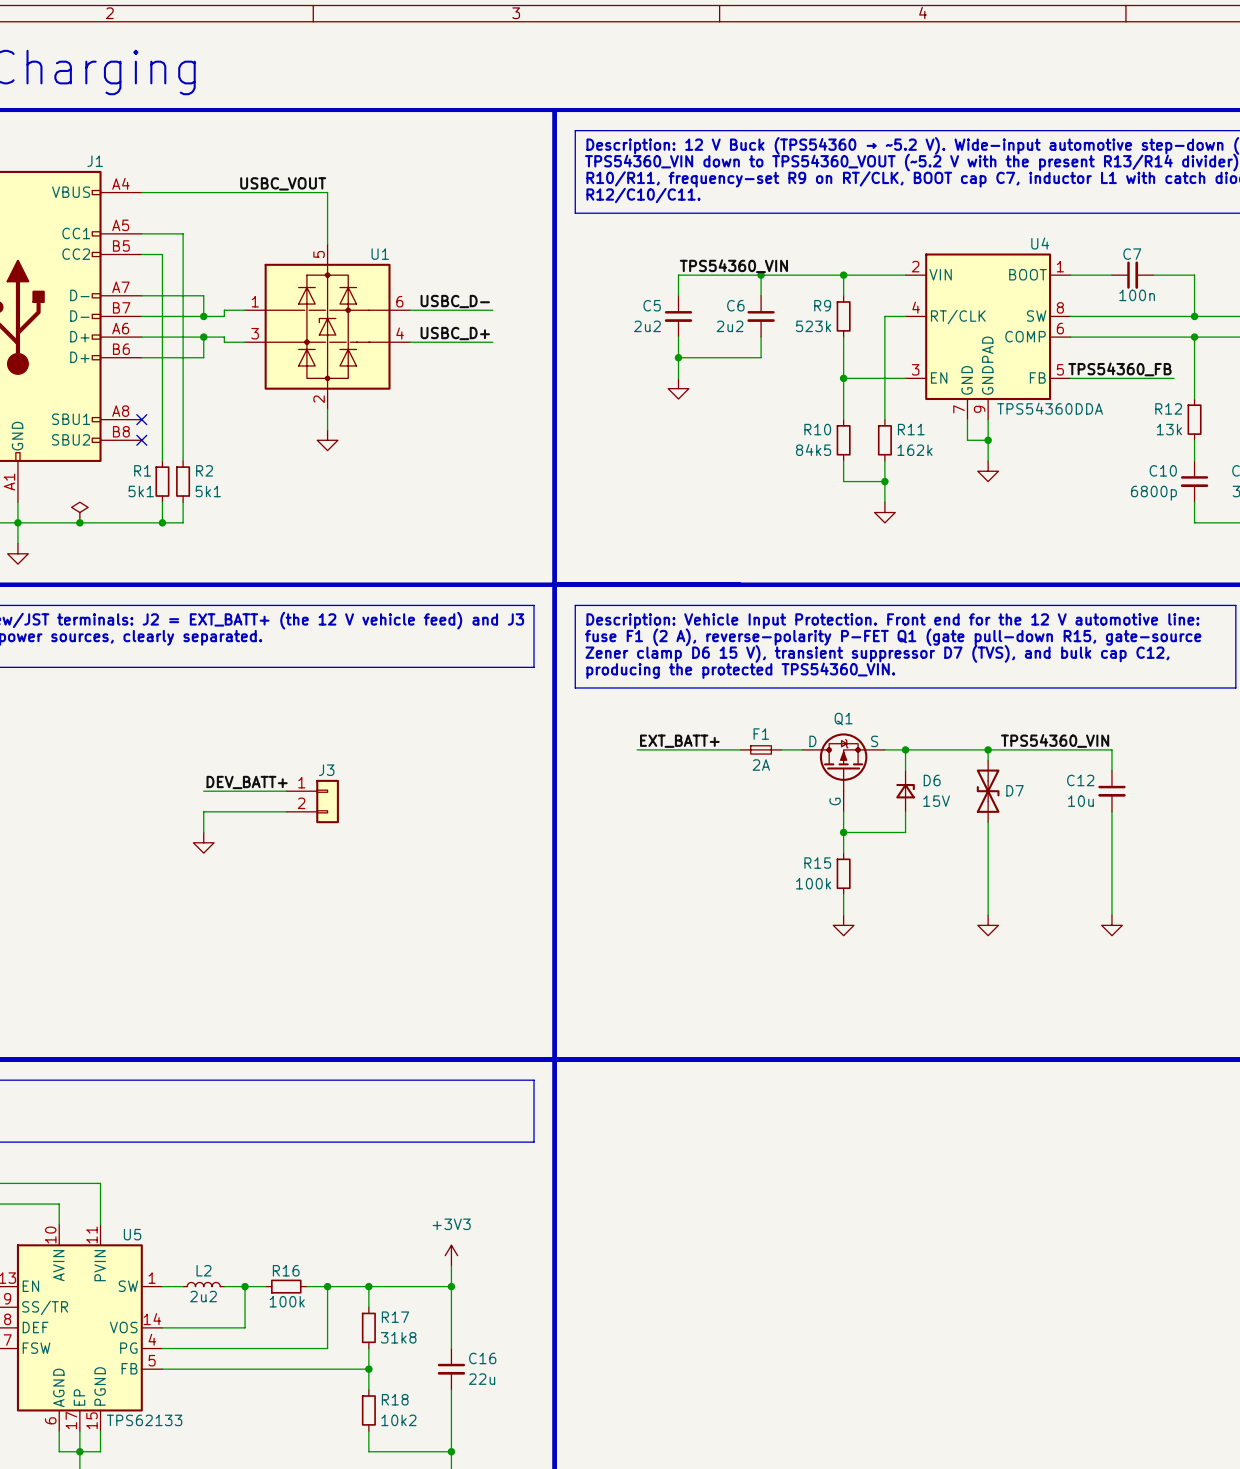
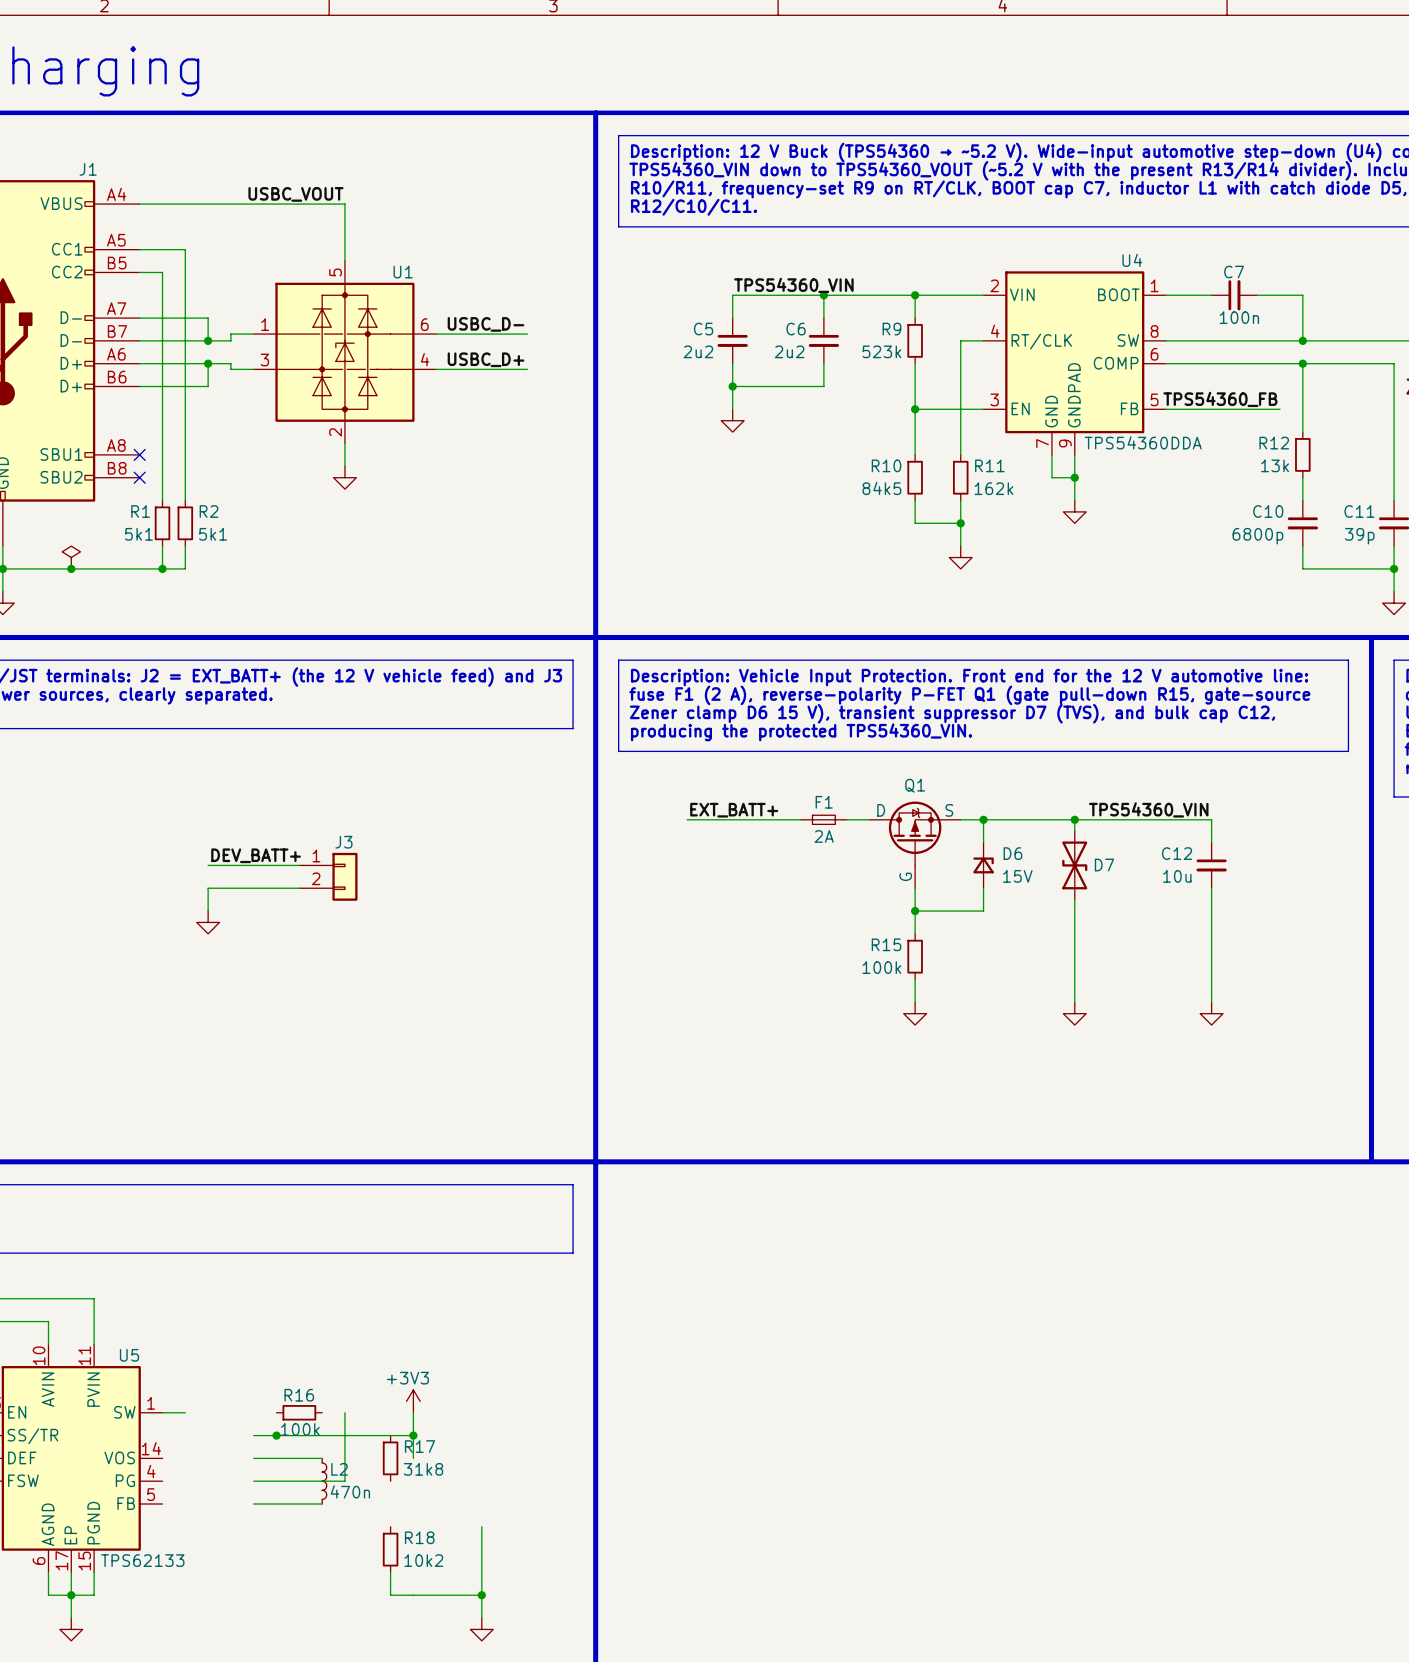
power symbol text position: +3V3 (451, 1224) -> +3V3 (407, 1378)
power symbol position: +3V3 (451, 1255) -> +3V3 (413, 1401)
wire: (451, 1265) (451, 1348) -> none
L2 rotation: 0° (203, 1284) -> 90° clockwise (324, 1481)
L2 position: (203, 1284) -> (324, 1481)
wire: (224, 1286) (265, 1286) -> none
wire: (245, 1286) (245, 1327) (162, 1327) -> none
junction position: (245, 1286) -> (276, 1435)
wire: (306, 1286) (451, 1286) -> (253, 1435) (413, 1435)
junction: (327, 1286) -> none
wire: (368, 1286) (368, 1307) -> none
junction position: (368, 1286) -> (413, 1435)
junction: (451, 1286) -> none
L2 value: 2u2 (203, 1296) -> 470n (350, 1491)
wire: (162, 1348) (245, 1348) -> none
wire: (368, 1348) (368, 1389) -> (413, 1412) (413, 1458)
wire: (162, 1369) (245, 1369) -> none
wire: (306, 1369) (368, 1369) -> (253, 1458) (322, 1458)
junction: (368, 1369) -> none
C16: 22u (451, 1369) -> none

